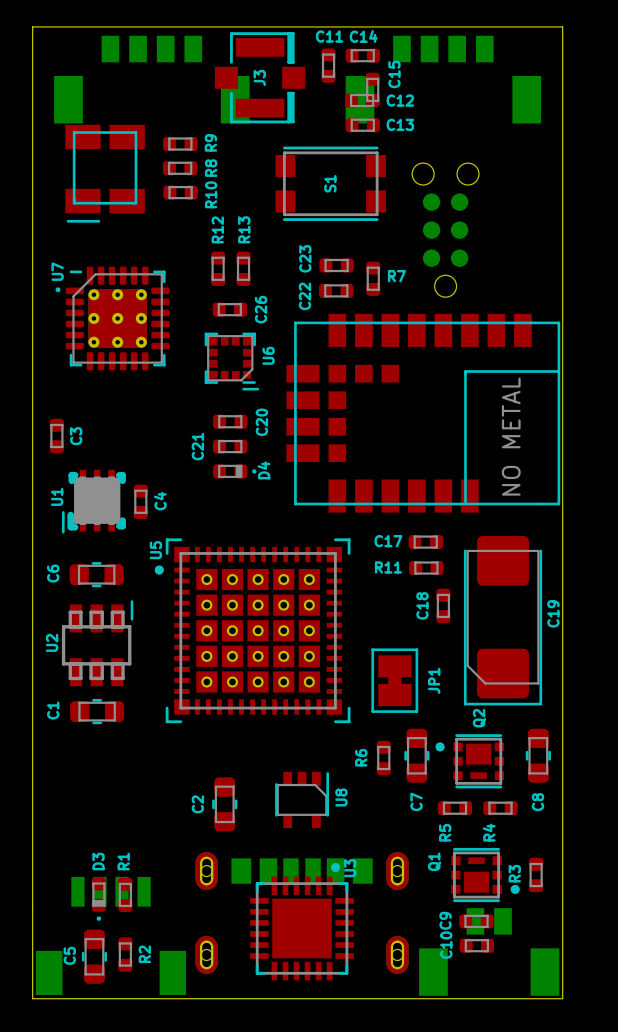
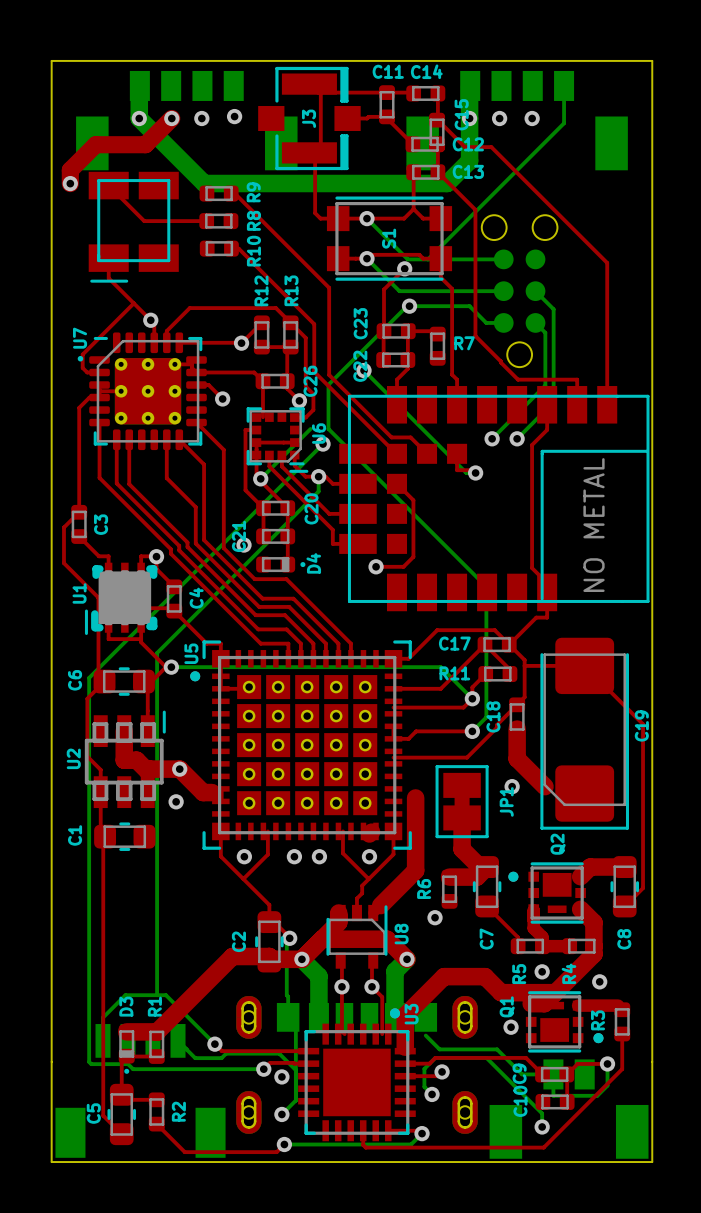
top track: none -> (309, 84) (317, 92) (413, 93)
bottom track: none -> (139, 85) (139, 118) (204, 183) (447, 183) (469, 161) (470, 85)
bottom track: none -> (564, 85) (564, 123) (427, 259)
top track: none -> (320, 92) (320, 152) (309, 152)
top track: none -> (437, 93) (437, 120)
via: none -> (234, 116)
via: none -> (139, 118)
top track: none -> (171, 118) (145, 144) (95, 144) (70, 170) (70, 183)
via: none -> (171, 118)
via: none -> (201, 118)
top track: none -> (347, 118) (387, 116) (412, 144)
via: none -> (469, 118)
via: none -> (499, 118)
via: none -> (532, 118)
top track: none -> (437, 120) (464, 147) (491, 147) (607, 262) (607, 404)
top track: none -> (437, 144) (437, 172) (475, 209) (475, 336) (518, 379) (577, 379) (577, 404)
top track: none -> (315, 152) (315, 213) (320, 218) (404, 218) (413, 209)
top track: none -> (413, 172) (413, 209)
via: none -> (70, 183)
top track: none -> (108, 185) (144, 221) (206, 221)
top track: none -> (231, 193) (234, 193) (329, 287) (329, 375) (391, 437) (410, 437) (427, 453)
top track: none -> (413, 209) (423, 218) (440, 218)
bottom track: none -> (366, 218) (407, 259) (503, 259)
via: none -> (366, 218)
top track: none -> (231, 248) (238, 248) (314, 324) (314, 371) (397, 453)
top track: none -> (108, 258) (108, 278) (133, 303) (82, 354) (82, 367) (87, 372) (99, 372)
top track: none -> (338, 258) (366, 258) (370, 254) (419, 254) (423, 258) (440, 258) (440, 277) (452, 288) (452, 374) (457, 379) (457, 404)
bottom track: none -> (366, 258) (399, 291) (503, 291)
via: none -> (366, 258)
top track: none -> (404, 268) (384, 289) (383, 359)
via: none -> (404, 268)
bottom track: none -> (535, 291) (553, 309) (553, 402) (517, 438)
top track: none -> (133, 303) (154, 323) (154, 342)
via: none -> (409, 306)
via: none -> (150, 320)
top track: none -> (261, 322) (241, 343) (179, 342)
bottom track: none -> (503, 322) (486, 322) (469, 306) (407, 306) (328, 384) (328, 428) (486, 586) (486, 717) (472, 731)
bottom track: none -> (535, 322) (545, 332) (545, 385) (492, 438)
top track: none -> (437, 334) (434, 331) (407, 331) (407, 368) (397, 379) (397, 404)
top track: none -> (166, 342) (166, 331) (189, 308) (275, 308) (305, 337) (305, 386) (313, 394) (313, 409) (305, 417) (294, 417)
via: none -> (241, 343)
top track: none -> (261, 347) (283, 347) (287, 350)
top track: none -> (287, 350) (287, 388) (299, 400)
top track: none -> (174, 364) (192, 364) (192, 368) (196, 372) (254, 372) (262, 381) (262, 417)
bottom track: none -> (364, 370) (466, 472) (475, 472)
via: none -> (364, 370)
top track: none -> (99, 385) (99, 397) (89, 397) (79, 407) (79, 512) (63, 527) (63, 563) (98, 597)
top track: none -> (196, 385) (208, 385) (222, 398)
top track: none -> (99, 391) (121, 391)
via: none -> (222, 398)
via: none -> (299, 400)
top track: none -> (547, 404) (547, 429) (532, 445) (532, 568) (547, 583) (547, 617) (536, 617) (509, 644)
top track: none -> (99, 422) (99, 477) (170, 549) (170, 553) (260, 643) (288, 643) (288, 658)
top track: none -> (196, 422) (223, 449) (223, 548) (254, 579) (286, 579) (350, 643) (350, 658)
bottom track: none -> (310, 428) (260, 478)
top track: none -> (256, 430) (245, 430) (245, 490) (263, 508) (263, 536)
via: none -> (492, 438)
via: none -> (517, 438)
top track: none -> (116, 439) (116, 483) (179, 545) (179, 550) (258, 629) (286, 629) (300, 643) (300, 658)
top track: none -> (129, 439) (129, 484) (187, 542) (187, 546) (255, 615) (284, 615) (313, 643) (313, 658)
top track: none -> (166, 439) (166, 478) (195, 507) (195, 543) (259, 606) (289, 606) (325, 643) (325, 658)
top track: none -> (179, 439) (204, 464) (204, 540) (262, 598) (293, 598) (338, 643) (338, 658)
top track: none -> (294, 442) (256, 442) (256, 474) (287, 508) (287, 564)
bottom track: none -> (323, 444) (89, 677) (89, 1061) (91, 1064) (128, 1064)
via: none -> (323, 444)
top track: none -> (457, 453) (457, 470) (472, 470) (475, 472)
top track: none -> (294, 455) (294, 465) (305, 476) (325, 476) (332, 483) (357, 483)
top track: none -> (269, 455) (269, 466) (332, 529) (332, 543) (357, 543)
top track: none -> (281, 455) (281, 466) (329, 513) (357, 513)
via: none -> (475, 472)
bottom track: none -> (318, 476) (318, 491) (157, 653) (157, 995)
via: none -> (318, 476)
via: none -> (260, 478)
top track: none -> (397, 483) (413, 500) (413, 556) (403, 566) (376, 566)
top track: none -> (79, 536) (98, 556) (108, 556) (108, 571)
via: none -> (244, 545)
via: none -> (156, 556)
via: none -> (376, 566)
top track: none -> (141, 571) (141, 556) (156, 556) (156, 569) (174, 586)
top track: none -> (98, 597) (98, 675) (104, 681) (87, 698) (87, 756) (100, 769) (100, 832) (105, 836) (103, 838) (103, 1115) (121, 1134)
top track: none -> (124, 608) (171, 608) (206, 643) (220, 643) (220, 688) (247, 688) (249, 687)
top track: none -> (108, 623) (108, 639) (141, 639)
top track: none -> (141, 623) (141, 642) (165, 667)
top track: none -> (393, 658) (408, 658) (437, 630) (494, 630) (524, 660) (524, 697) (467, 757) (393, 757)
top track: none -> (524, 665) (584, 665) (643, 724) (643, 888) (624, 906)
top track: none -> (165, 667) (147, 685)
bottom track: none -> (171, 667) (440, 667) (472, 698)
via: none -> (171, 667)
top track: none -> (485, 674) (472, 687) (472, 698) (463, 707) (393, 707)
top track: none -> (509, 674) (509, 669) (484, 644) (440, 688) (393, 688)
top track: none -> (147, 685) (147, 731)
via: none -> (472, 698)
top track: none -> (393, 726) (393, 738) (408, 738) (416, 731) (472, 731)
top track: none -> (517, 729) (517, 758) (544, 786)
top track: none -> (124, 731) (124, 760) (136, 760) (147, 771) (149, 769) (179, 769) (203, 792) (211, 792) (220, 801) (220, 788)
via: none -> (472, 731)
via: none -> (179, 769)
via: none -> (512, 786)
top track: none -> (415, 797) (415, 870) (373, 913)
via: none -> (176, 801)
top track: none -> (462, 817) (462, 849) (479, 867) (487, 867) (477, 877) (449, 877)
top track: none -> (220, 831) (220, 856) (269, 905) (269, 917) (289, 938)
top track: none -> (267, 831) (267, 854) (243, 879)
top track: none -> (342, 831) (342, 853) (368, 879)
top track: none -> (393, 831) (393, 854) (362, 885) (362, 893) (356, 898) (356, 913)
top track: none -> (371, 831) (369, 834)
via: none -> (244, 856)
via: none -> (294, 856)
via: none -> (319, 856)
via: none -> (369, 856)
top track: none -> (624, 867) (590, 867) (580, 876)
top track: none -> (487, 906) (518, 937) (518, 946)
top track: none -> (533, 909) (533, 928) (542, 937) (542, 946) (569, 946)
top track: none -> (580, 909) (593, 922) (593, 954) (544, 1003) (531, 1003) (531, 1005)
top track: none -> (338, 913) (338, 922) (301, 959) (232, 956) (156, 1032) (126, 1031)
via: none -> (435, 917)
bottom track: none -> (289, 938) (286, 941) (286, 995) (288, 1017) (295, 1025) (295, 1100) (281, 1114)
via: none -> (289, 938)
top track: none -> (322, 939) (386, 939) (407, 959)
bottom track: none -> (301, 959) (318, 976) (318, 1017)
via: none -> (301, 959)
bottom track: none -> (407, 959) (395, 971) (395, 1017)
via: none -> (407, 959)
top track: none -> (340, 960) (341, 1031) (344, 1034)
top track: none -> (373, 960) (371, 986) (382, 997) (382, 1034)
via: none -> (542, 971)
via: none -> (599, 981)
via: none -> (341, 986)
via: none -> (371, 986)
top track: none -> (555, 992) (501, 992) (485, 976) (444, 976) (405, 1015) (405, 1051)
top track: none -> (578, 1005) (618, 1005)
via: none -> (511, 1027)
top track: none -> (622, 1034) (622, 1069) (543, 1147) (365, 1147) (363, 1145) (363, 1130)
bottom track: none -> (425, 1035) (439, 1049) (497, 1049) (522, 1074) (553, 1074) (553, 1095) (597, 1095) (607, 1085) (607, 1063)
bottom track: none -> (103, 1040) (103, 1017) (125, 995) (165, 995) (214, 1044)
bottom track: none -> (178, 1040) (195, 1058) (221, 1058) (226, 1053) (279, 1053) (295, 1070)
top track: none -> (214, 1044) (221, 1051) (308, 1051)
via: none -> (214, 1044)
top track: none -> (156, 1056) (126, 1056) (121, 1061) (121, 1094) (126, 1099) (156, 1099)
top track: none -> (308, 1063) (270, 1062) (263, 1069)
top track: none -> (405, 1063) (429, 1063) (435, 1057) (526, 1057) (542, 1074)
bottom track: none -> (128, 1064) (133, 1069) (263, 1069)
top track: none -> (607, 1063) (577, 1063) (567, 1074) (567, 1101)
via: none -> (607, 1063)
via: none -> (263, 1069)
top track: none -> (442, 1071) (437, 1076) (405, 1076)
via: none -> (442, 1071)
via: none -> (281, 1076)
bottom track: none -> (432, 1094) (424, 1086) (424, 1068) (435, 1057) (486, 1057) (542, 1113) (542, 1126)
via: none -> (432, 1094)
via: none -> (281, 1114)
top track: none -> (156, 1124) (184, 1152) (276, 1152) (284, 1144)
via: none -> (542, 1126)
top track: none -> (388, 1130) (419, 1130) (422, 1133)
bottom track: none -> (422, 1133) (411, 1144) (284, 1144)
via: none -> (422, 1133)
via: none -> (284, 1144)

